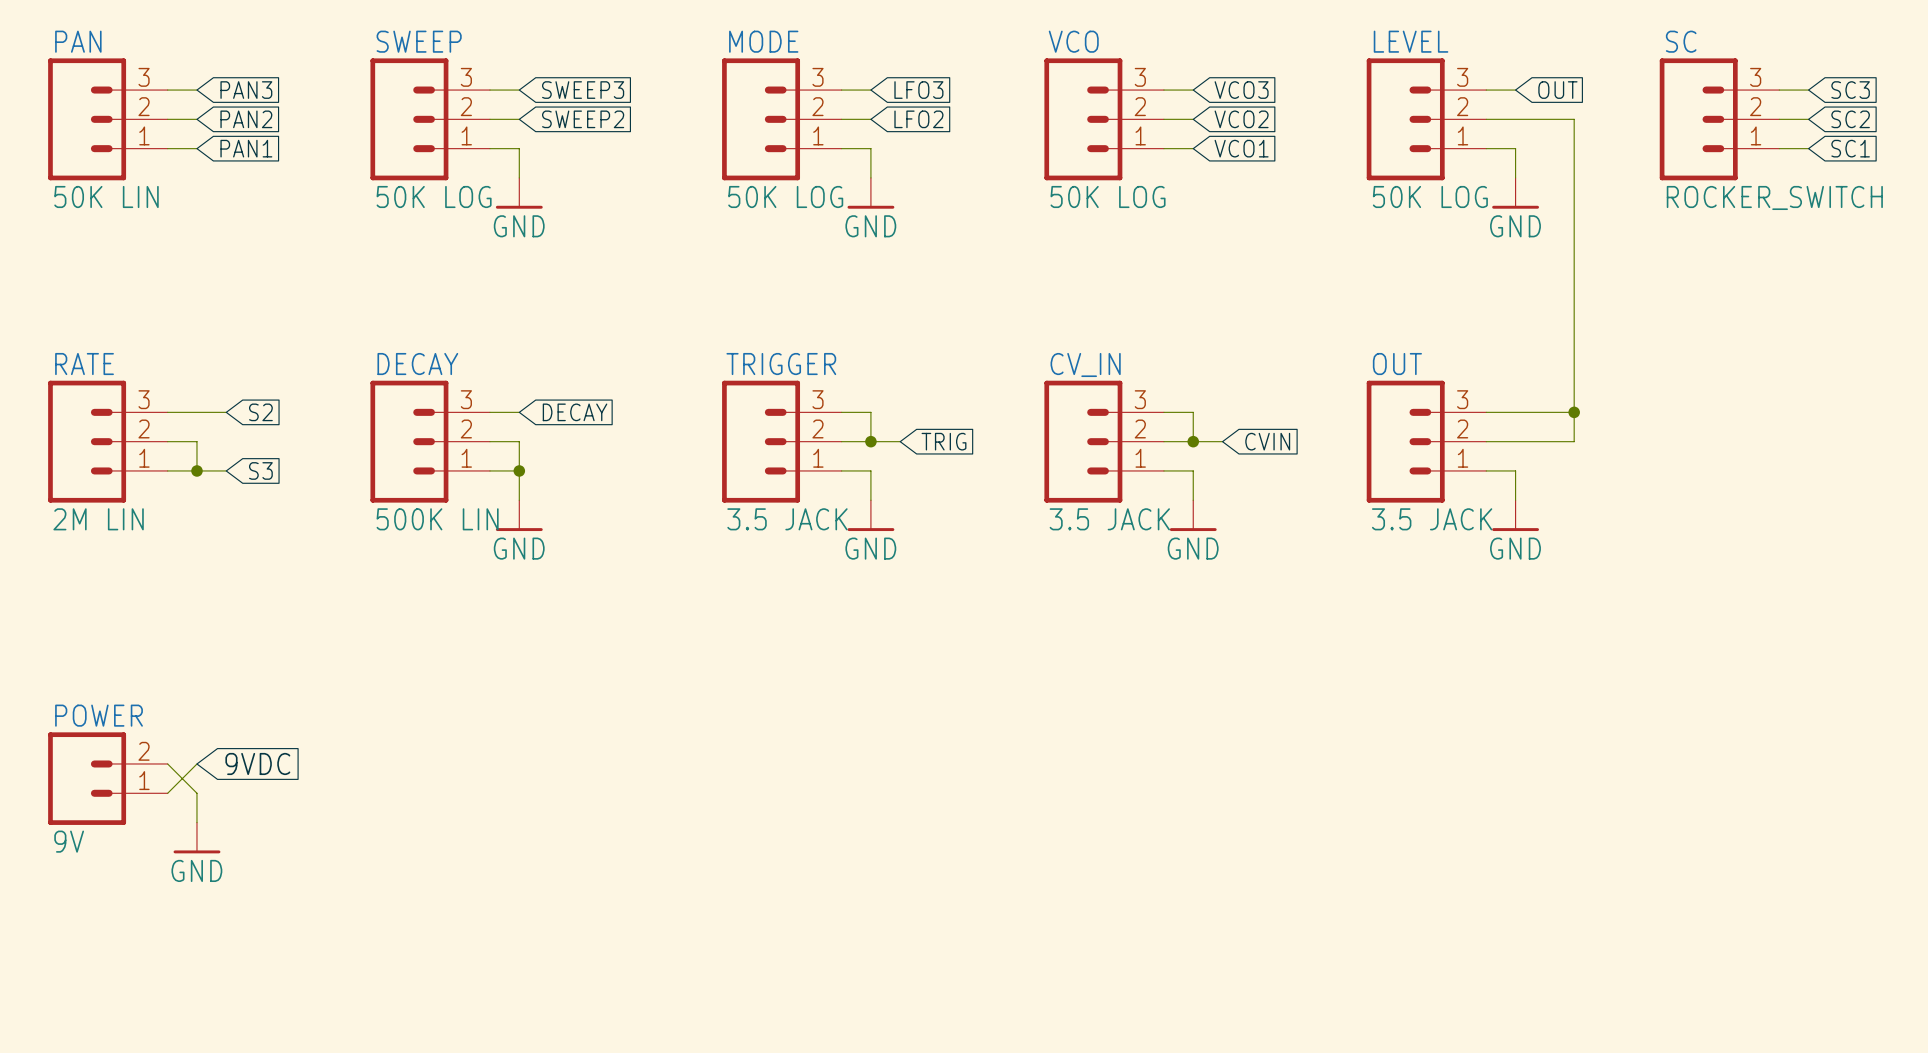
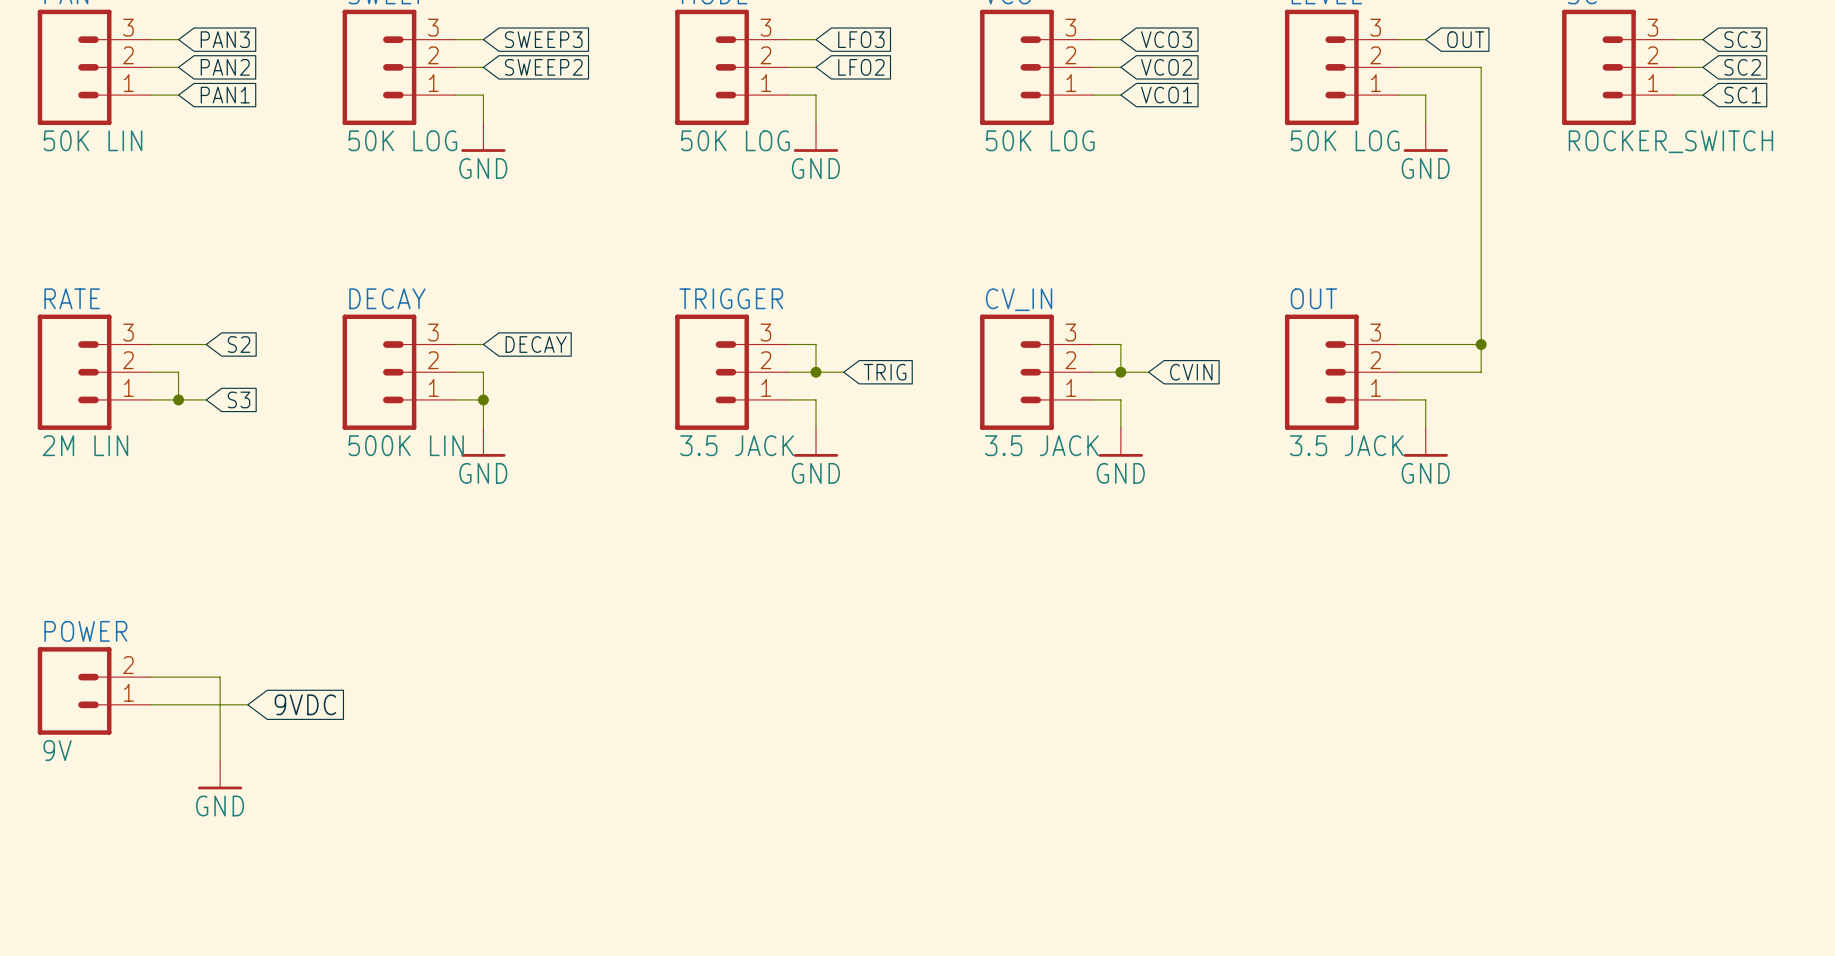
wire: (167, 763) (196, 793) (196, 822) -> (150, 677) (220, 677) (220, 760)
wire: (196, 763) (167, 793) -> (247, 704) (150, 704)
global label position: 9VDC (257, 763) -> 9VDC (305, 704)
power symbol position: GND (196, 837) -> GND (220, 774)

